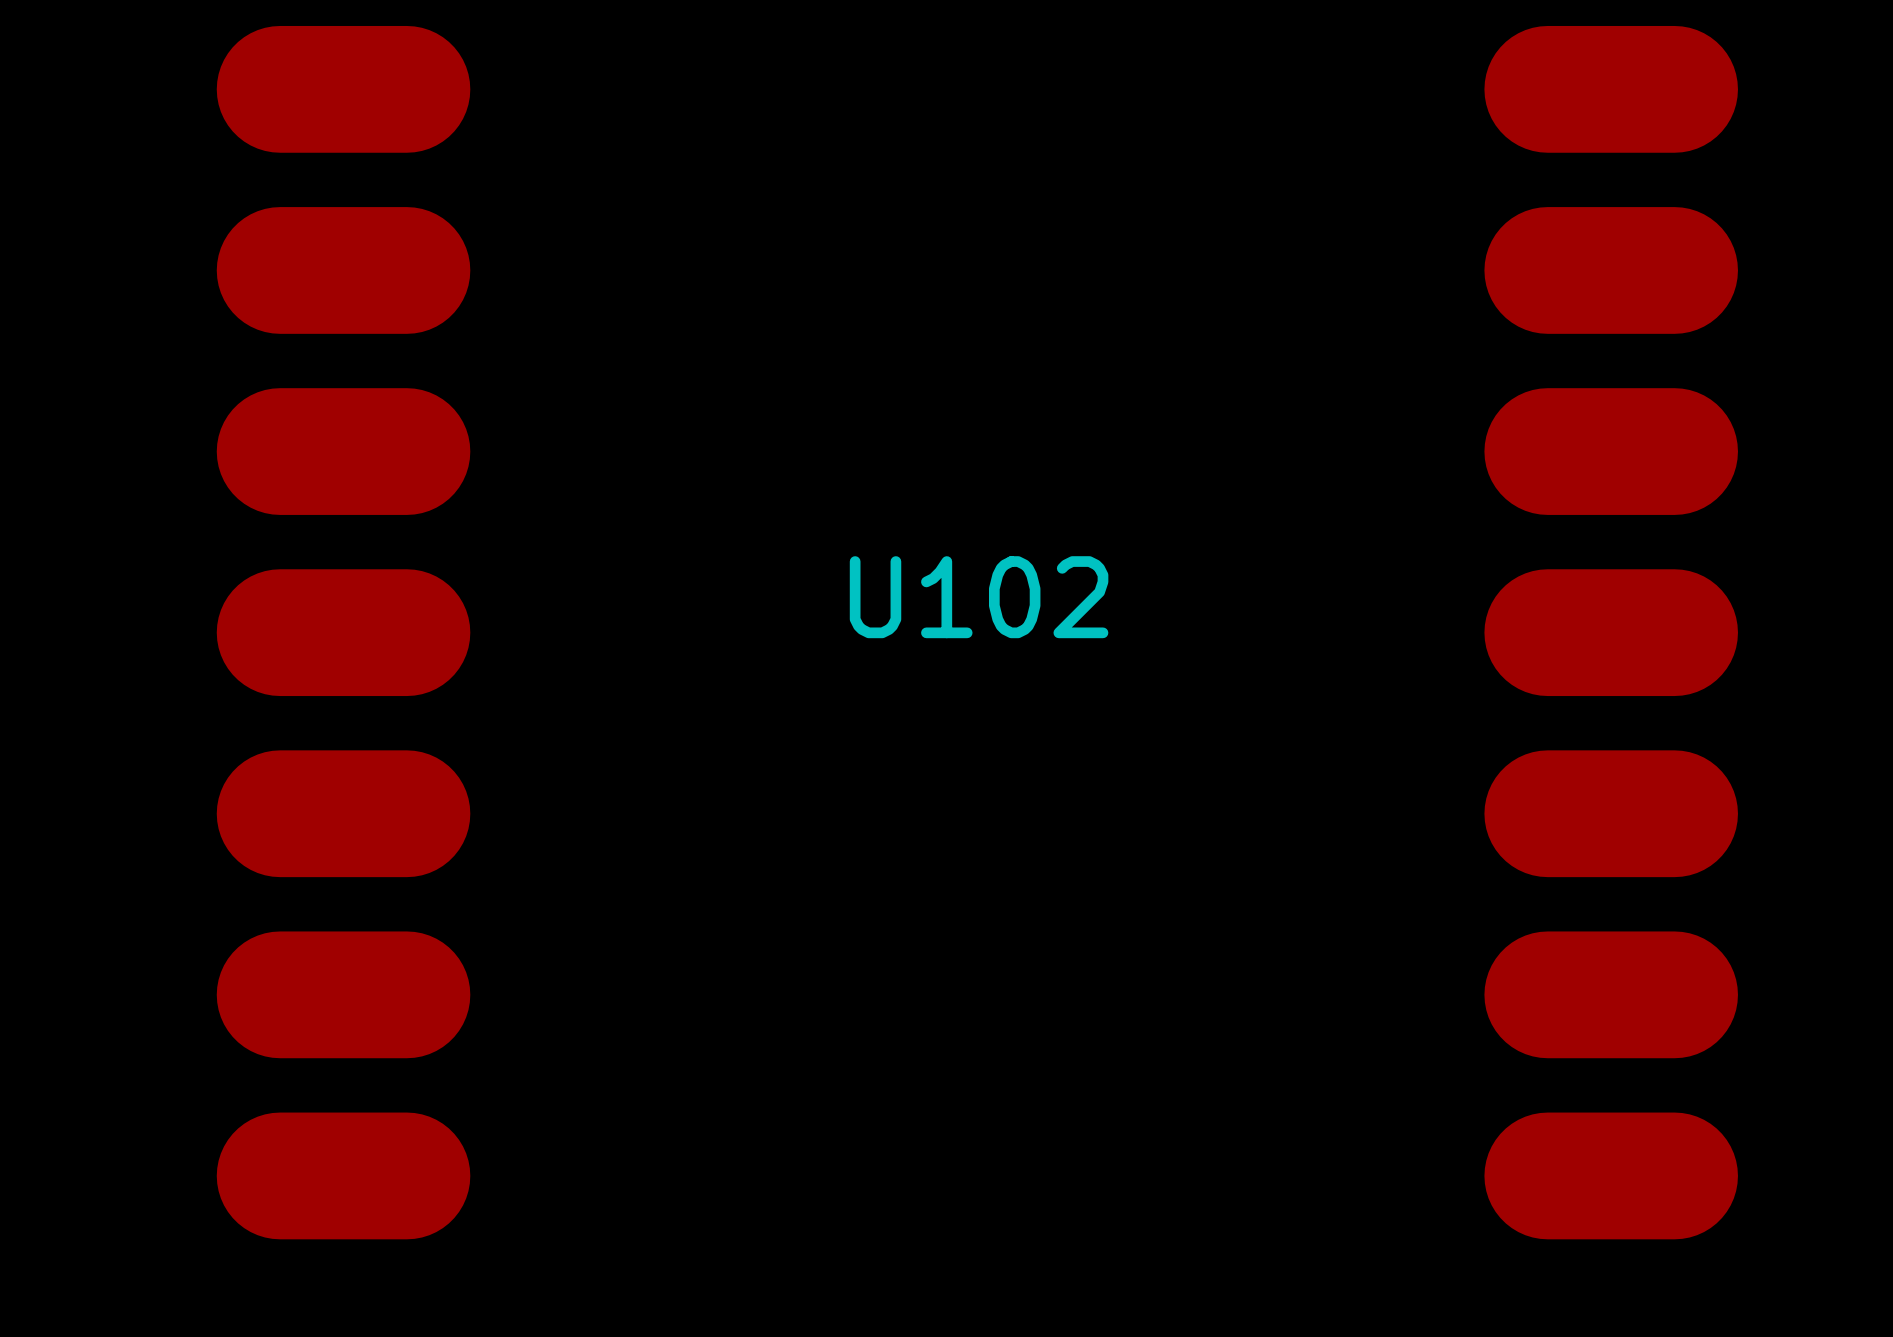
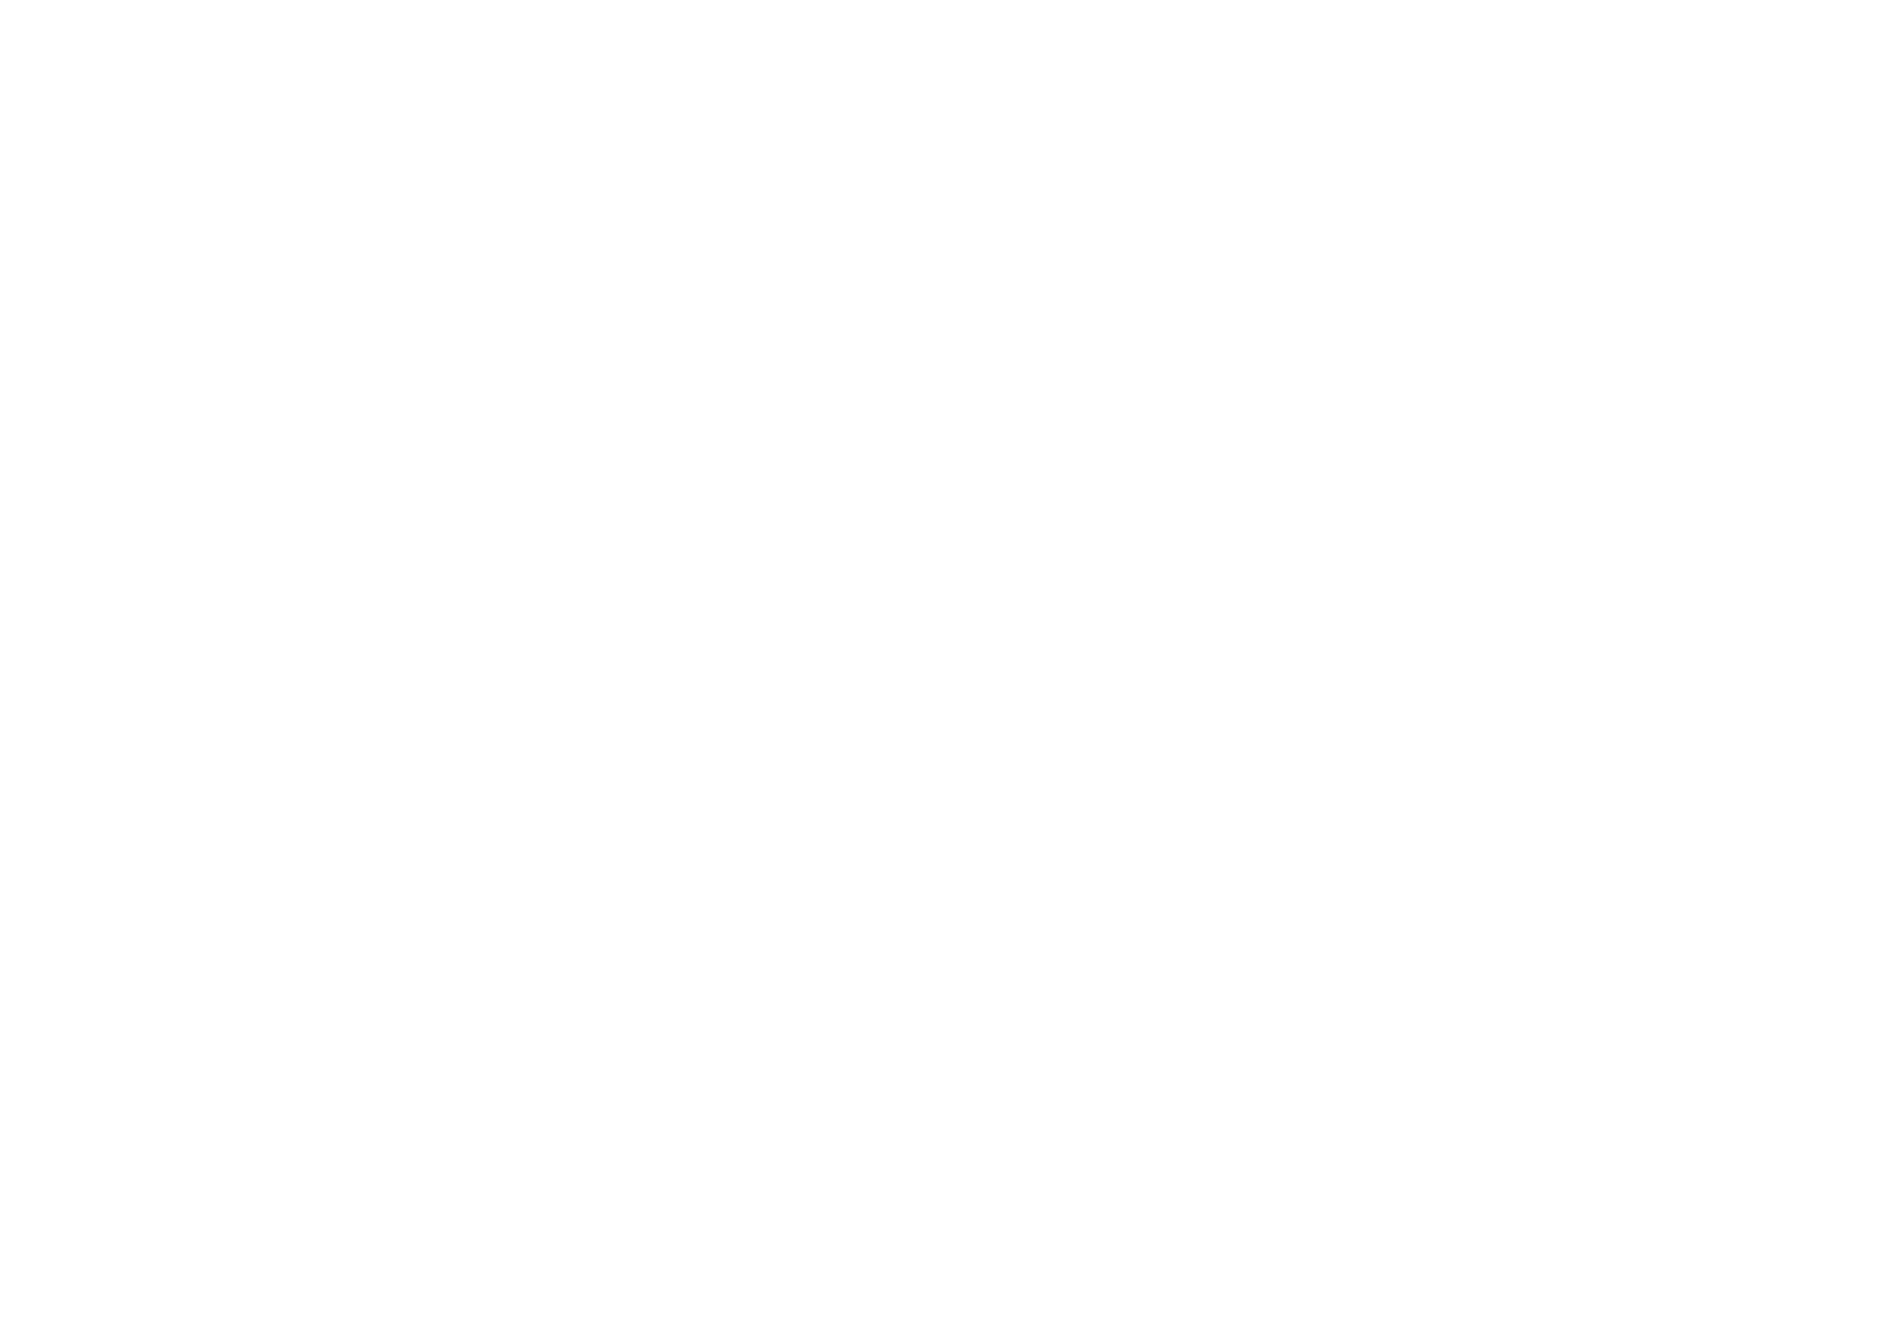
U102: (977, 632) -> none

